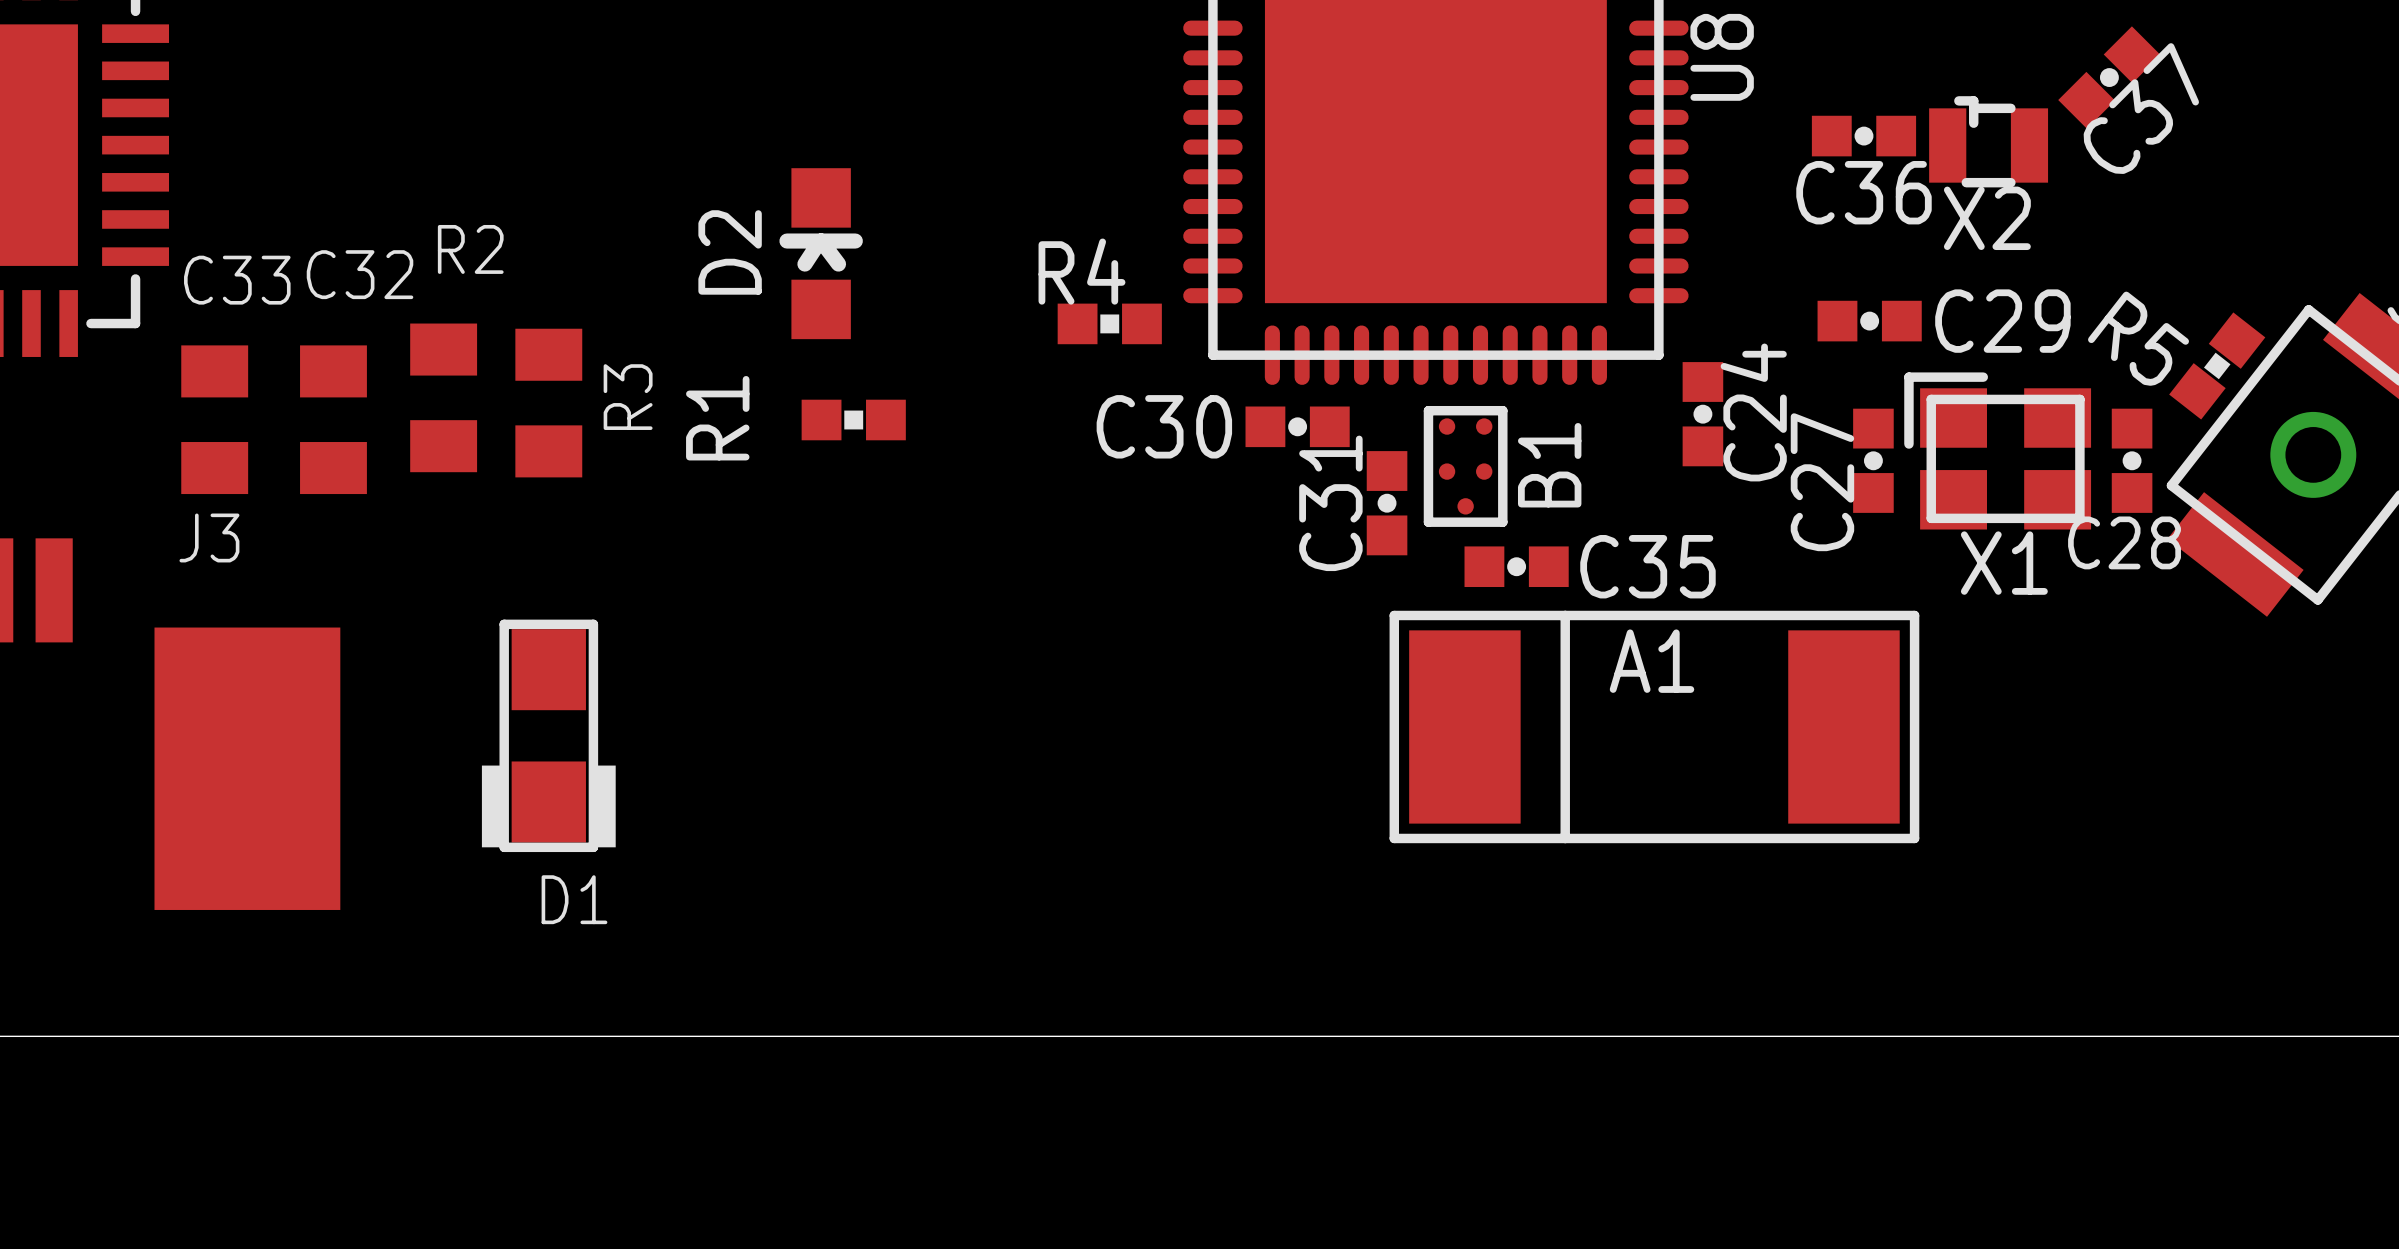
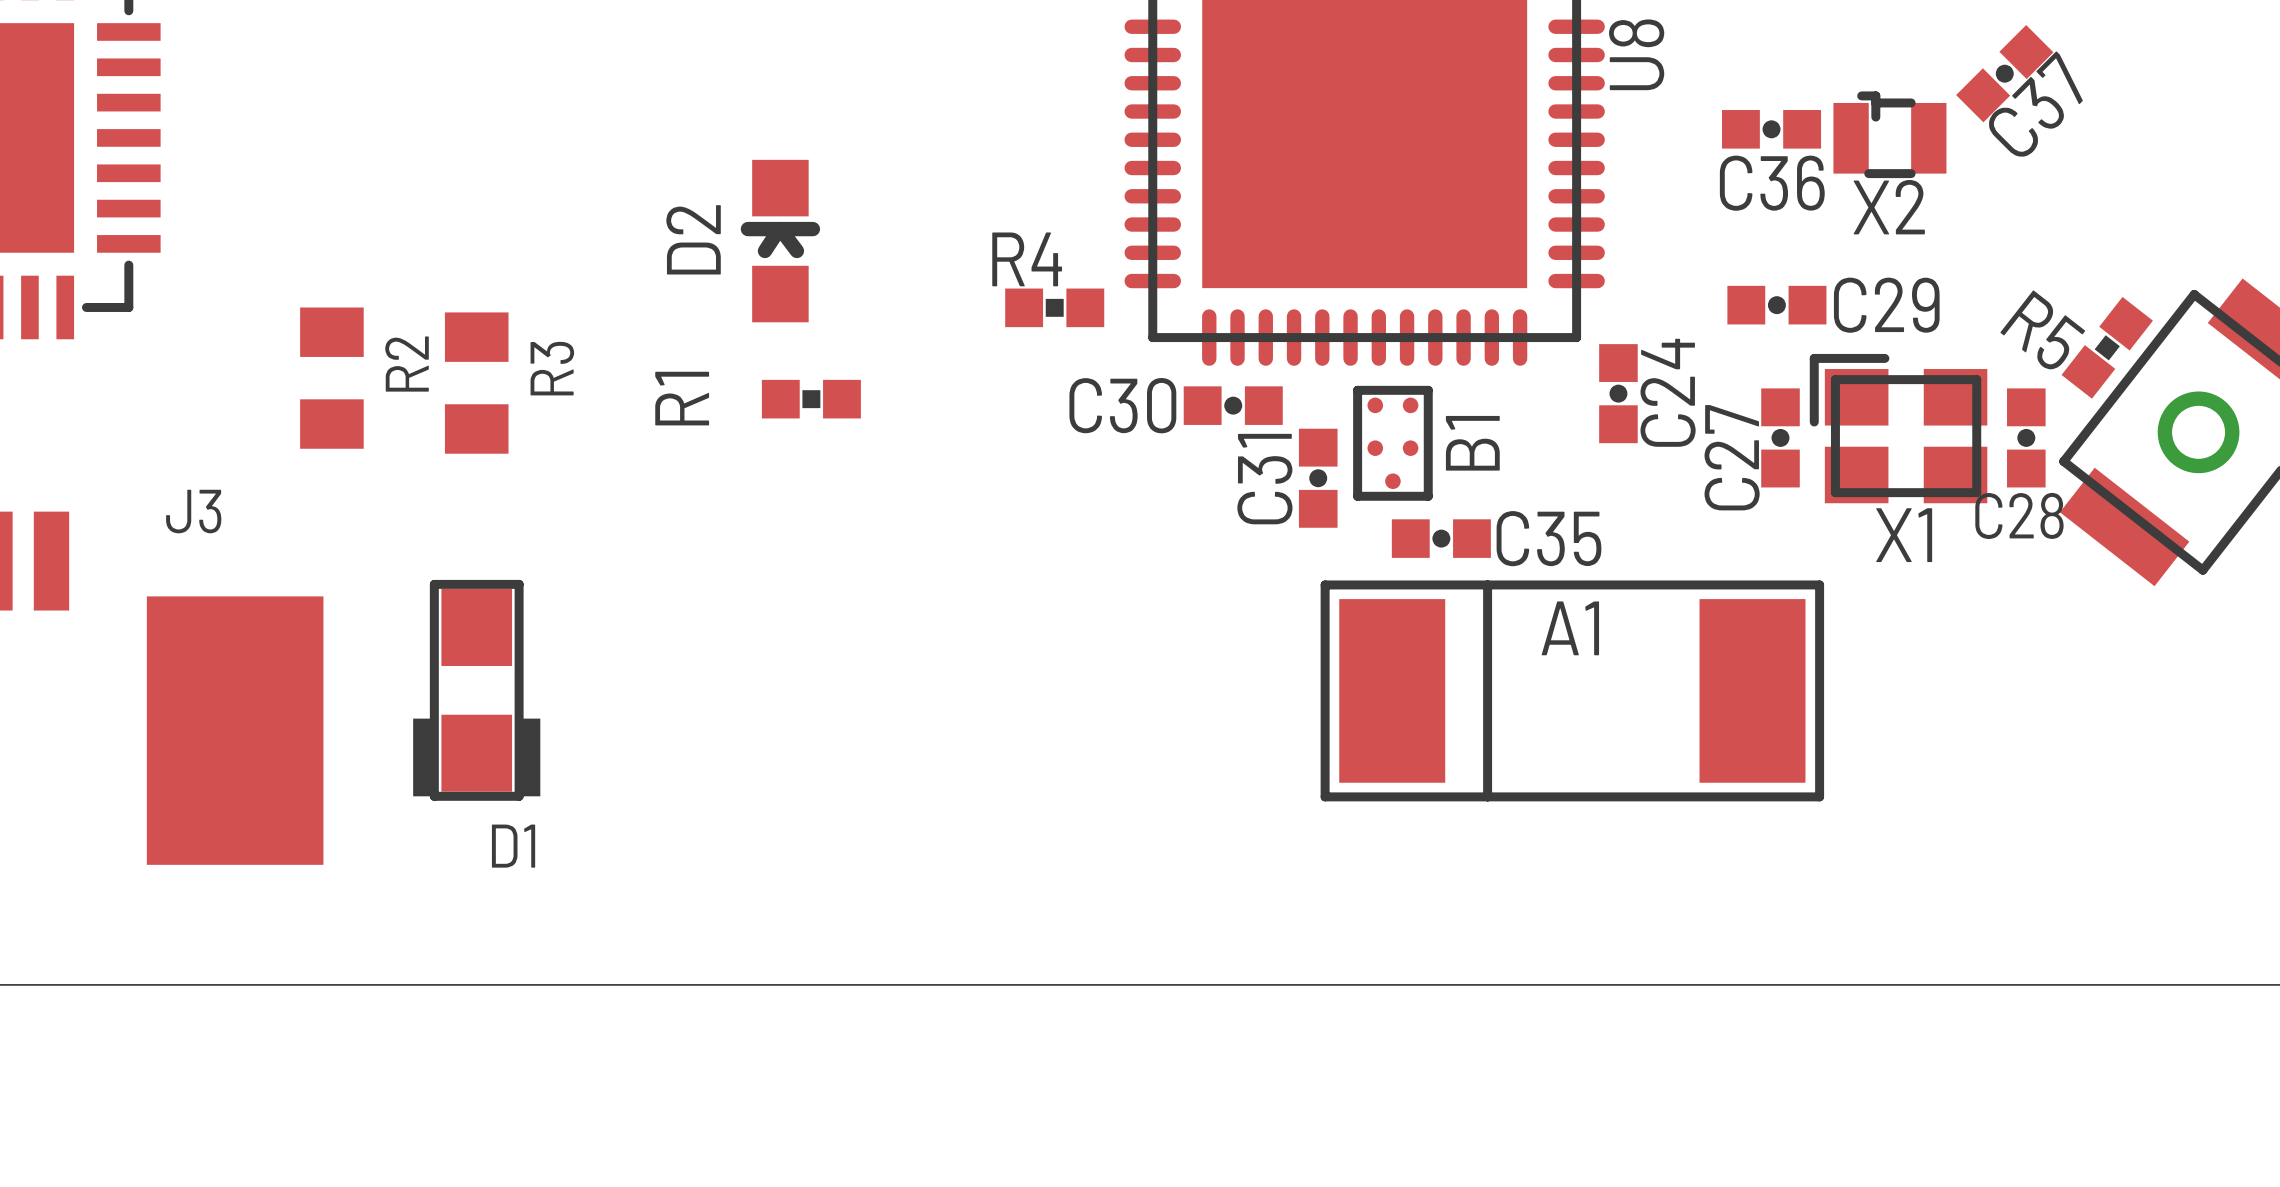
R2 name rotation: 0° (470, 249) -> 90° counterclockwise (407, 364)
R2 name position: R2 (470, 249) -> R2 (407, 364)
R2 position: (443, 397) -> (331, 378)
R3 position: (548, 403) -> (476, 383)
C33: (214, 419) -> none
C32: (333, 419) -> none
D1 position: (548, 735) -> (476, 690)

